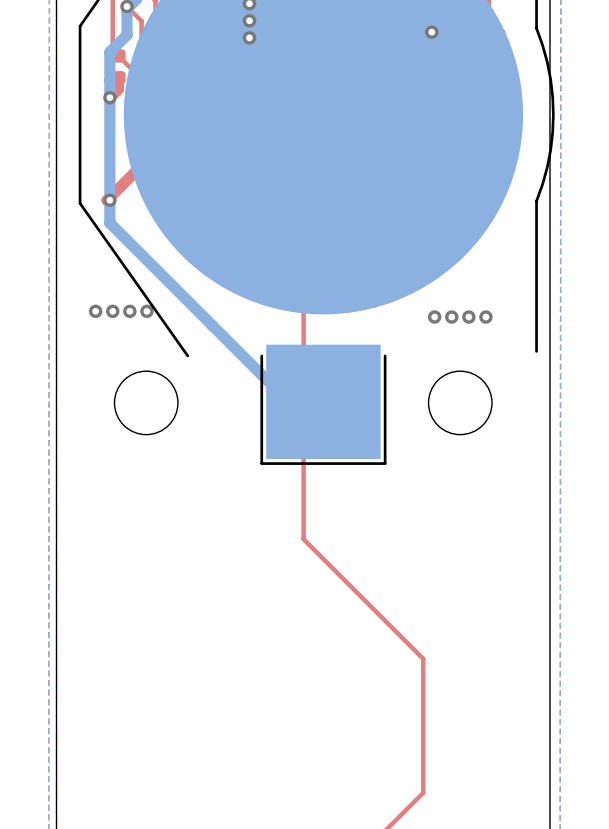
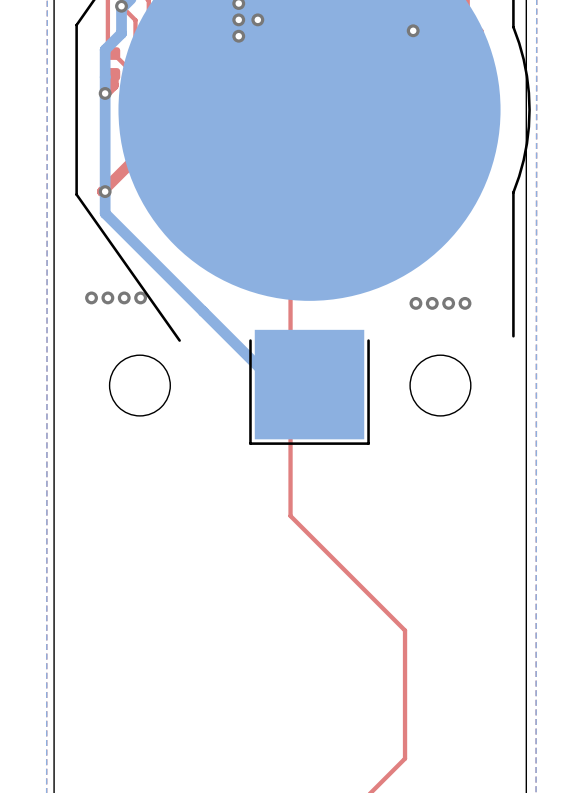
via: none -> (257, 19)

